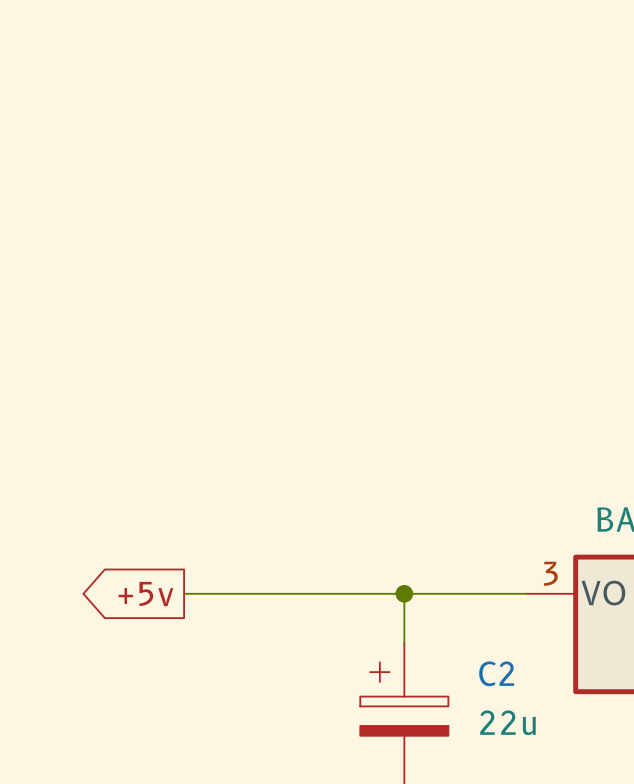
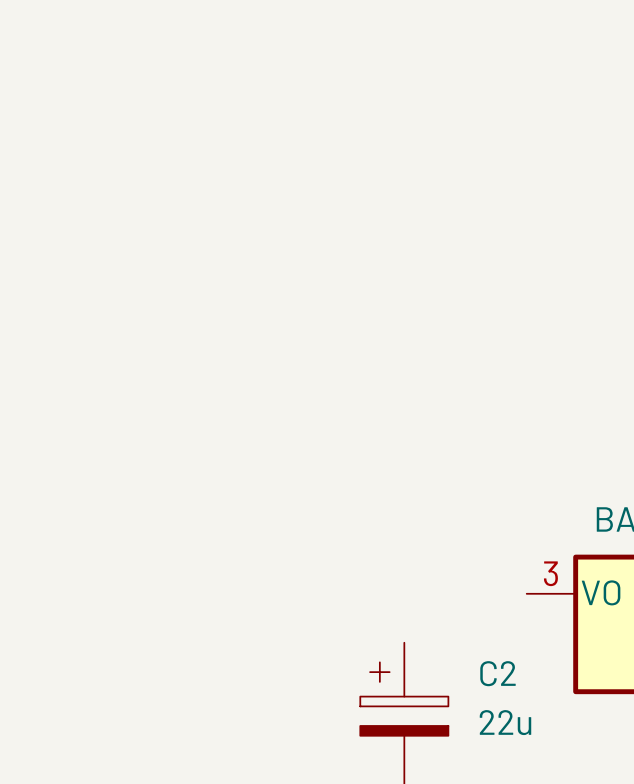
wire: (184, 593) (526, 593) -> none
wire: (404, 593) (404, 642) -> none
junction: (404, 593) -> none
global label: +5v (145, 594) -> none

